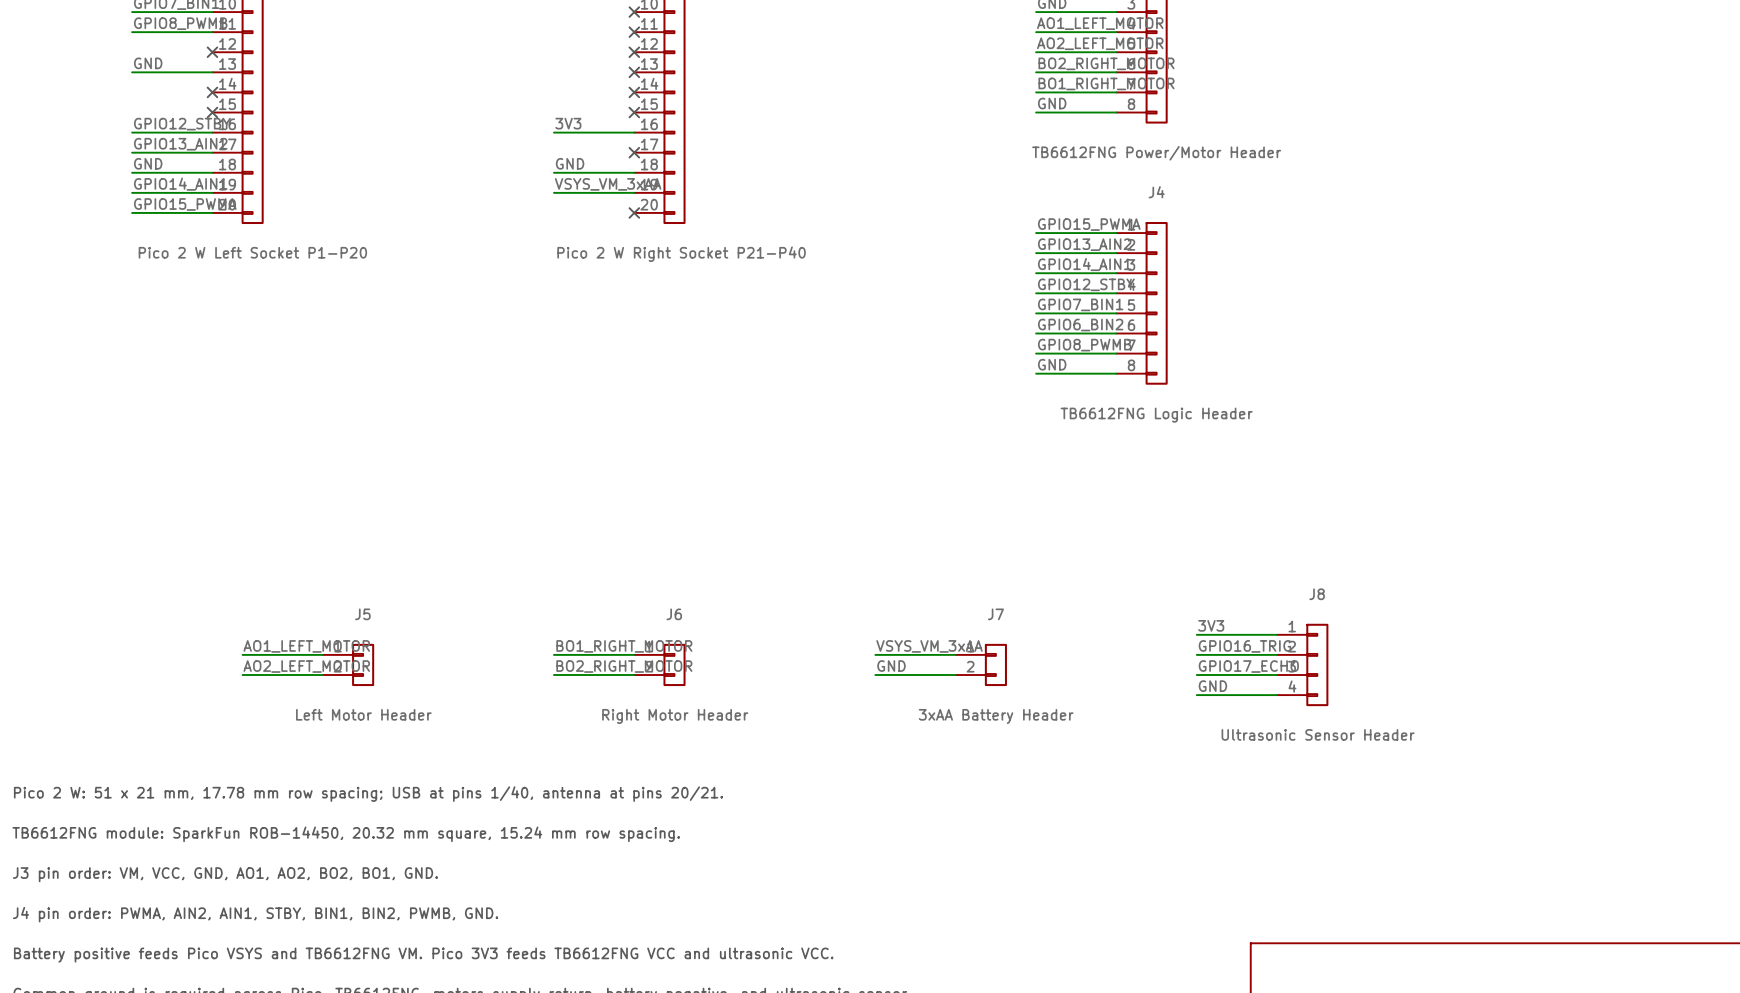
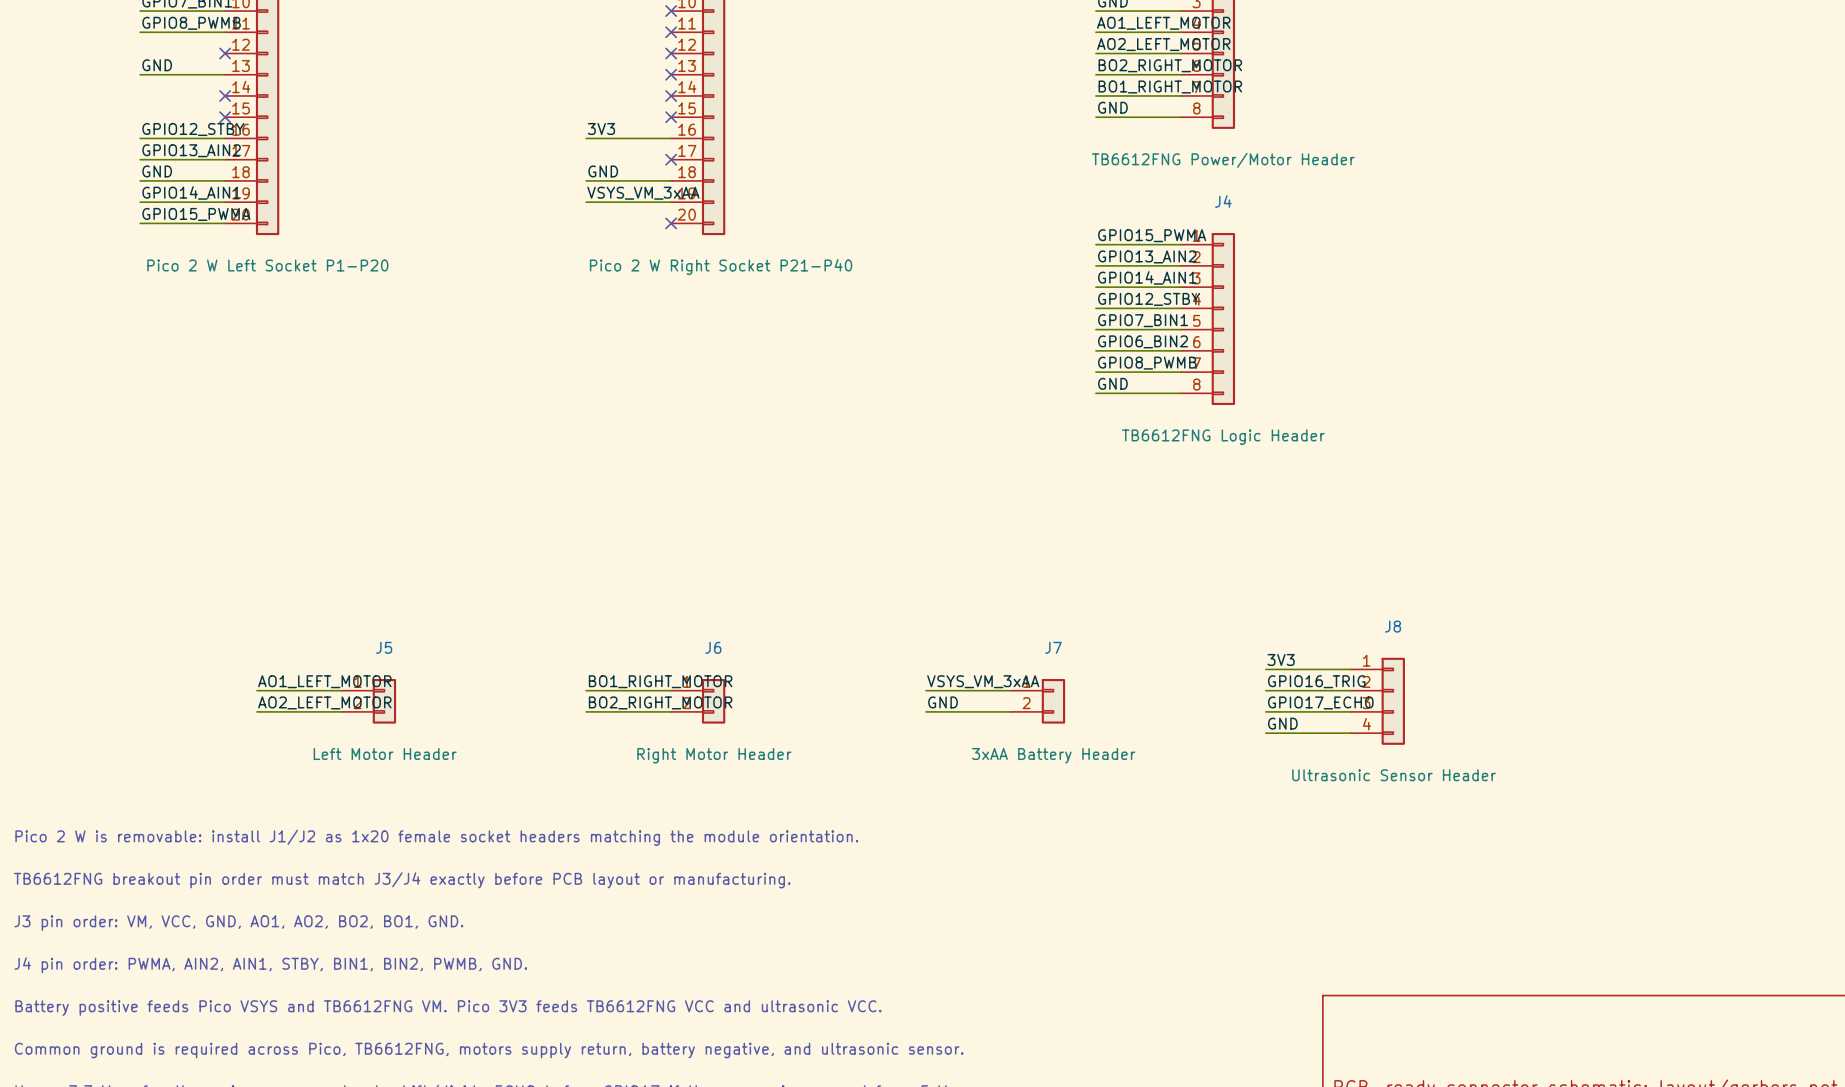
text: Pico 2 W: 51 x 21 mm, 17.78 mm row spacing; USB at pins 1/40, antenna at pins 20/21. (368, 794) -> Pico 2 W is removable: install J1/J2 as 1x20 female socket headers matching the module orientation. (436, 837)
text: TB6612FNG module: SparkFun ROB-14450, 20.32 mm square, 15.24 mm row spacing. (346, 834) -> TB6612FNG breakout pin order must match J3/J4 exactly before PCB layout or manufacturing. (402, 880)

